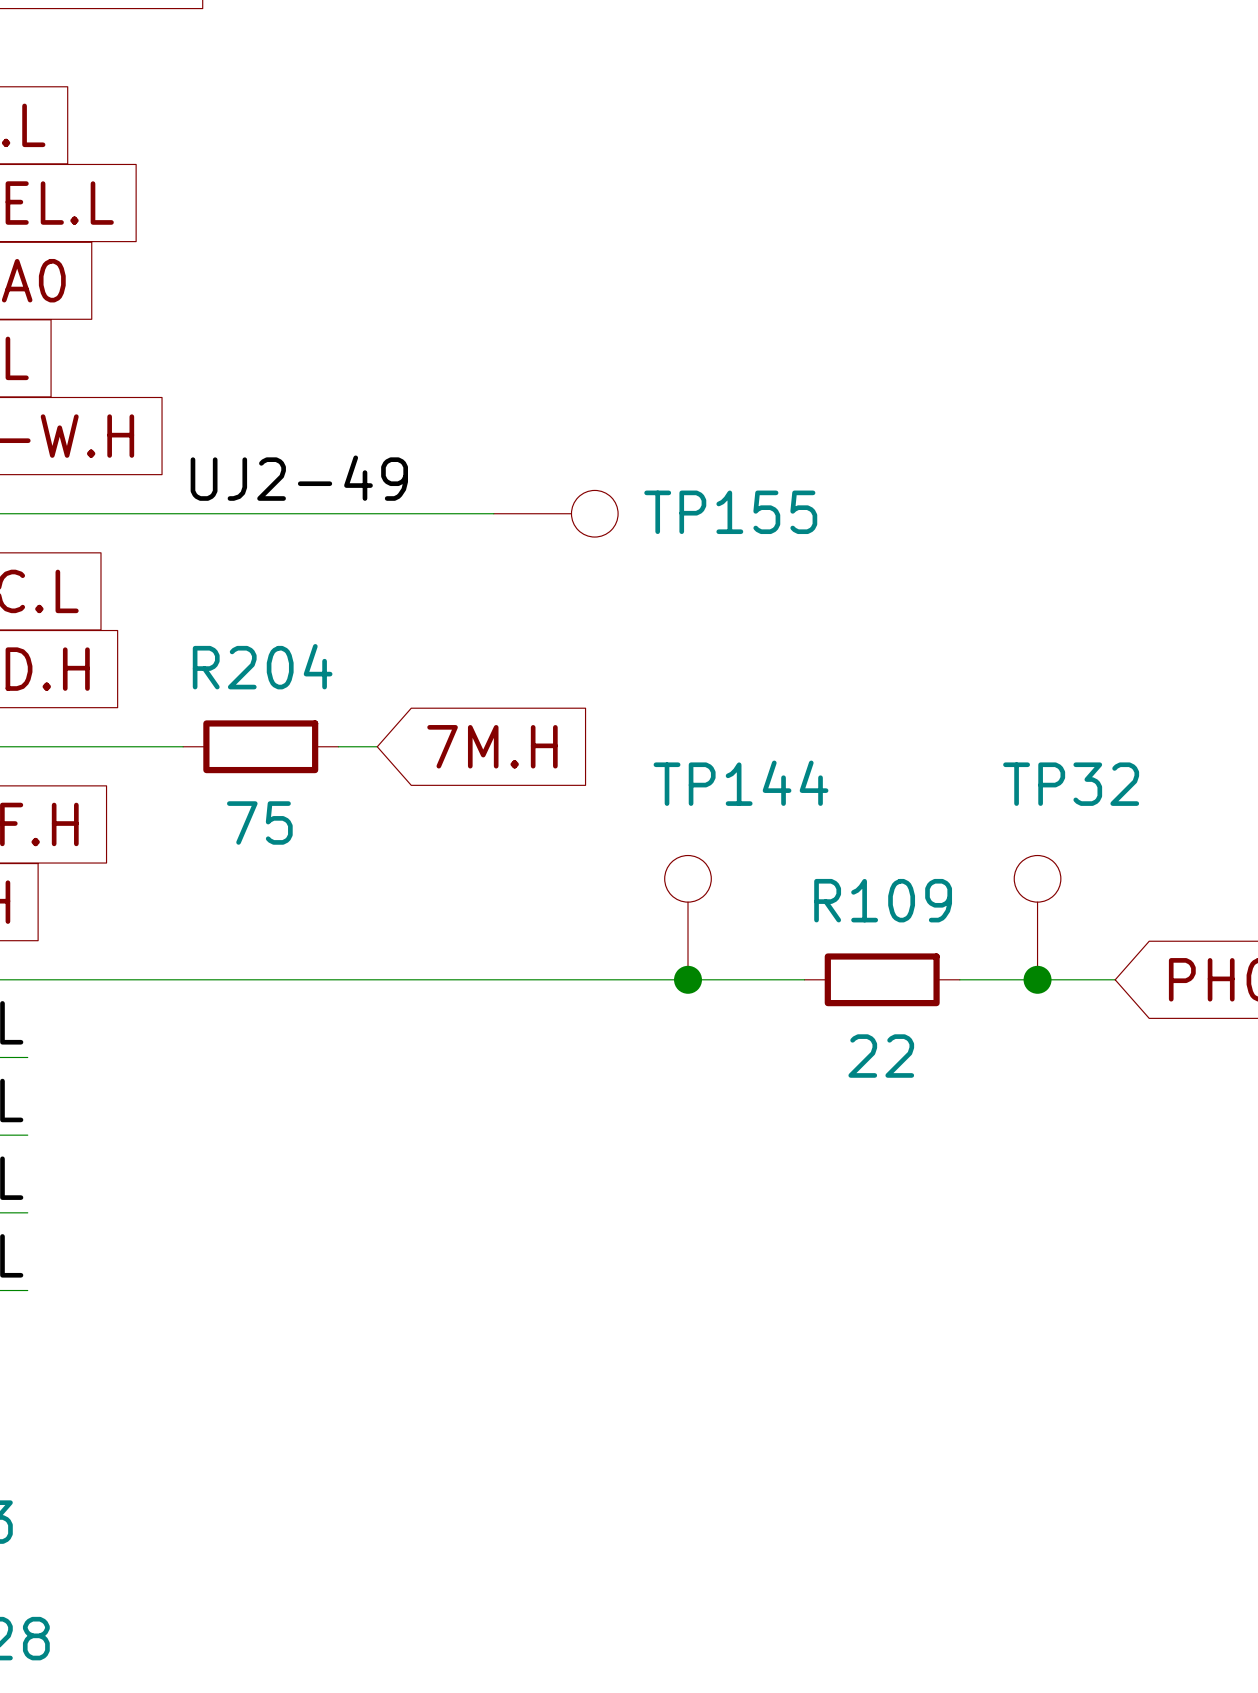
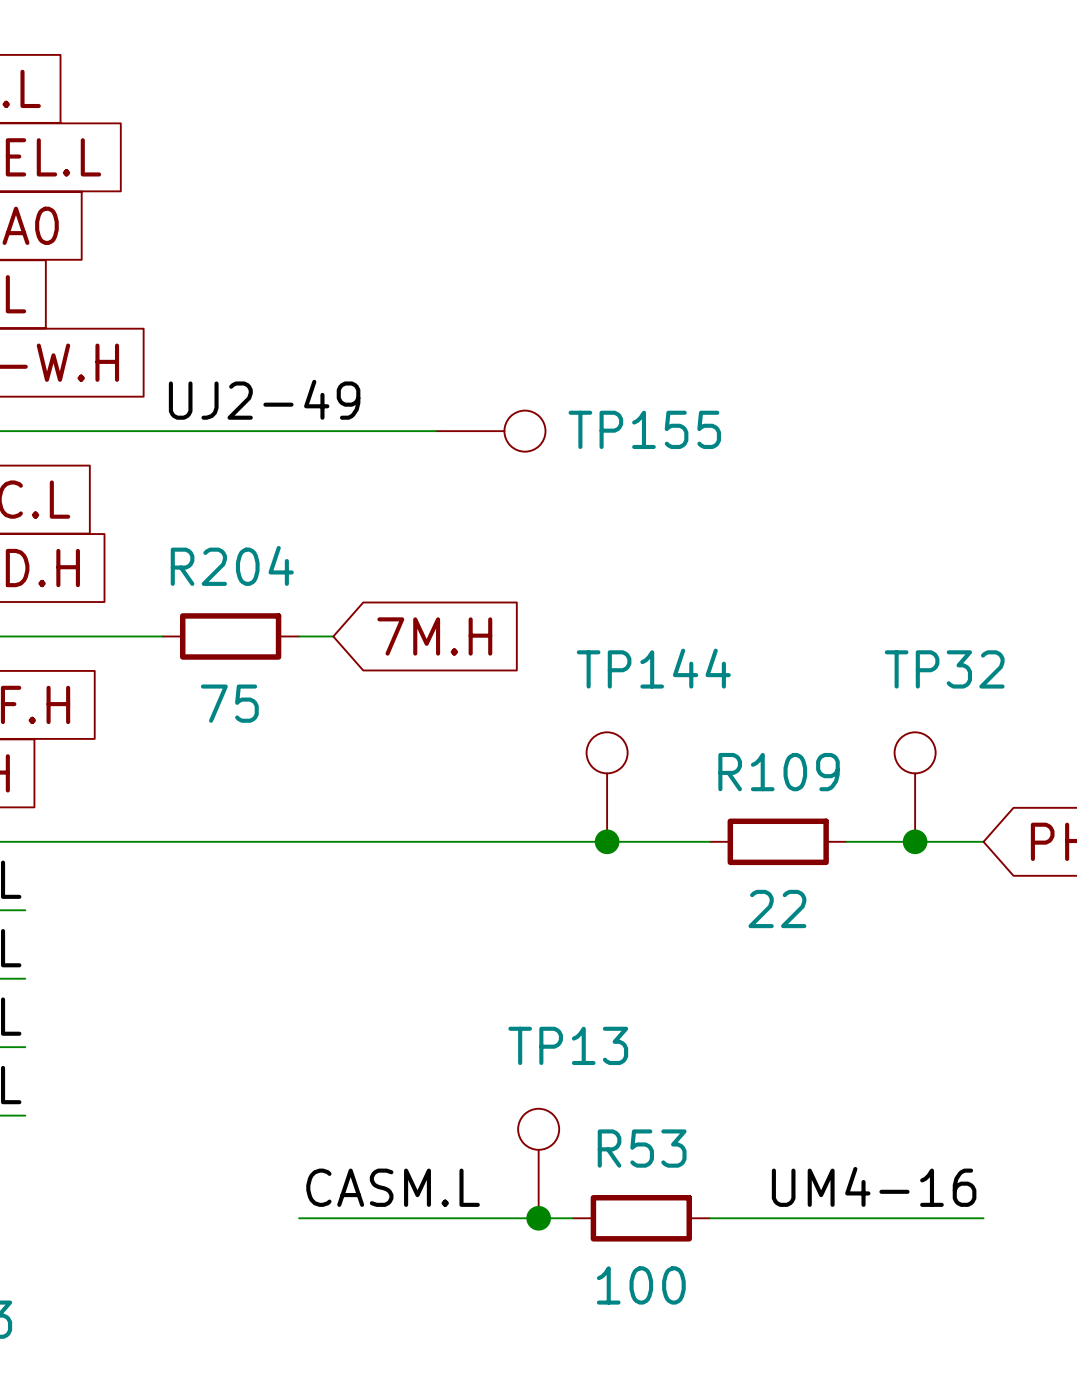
TP13: none -> (538, 1163)
label: none -> UM4-16 (874, 1186)
label: none -> CASM.L (393, 1187)
wire: none -> (299, 1218) (572, 1218)
junction: none -> (538, 1218)
R53: none -> 100 (641, 1218)
wire: none -> (709, 1218) (983, 1218)

